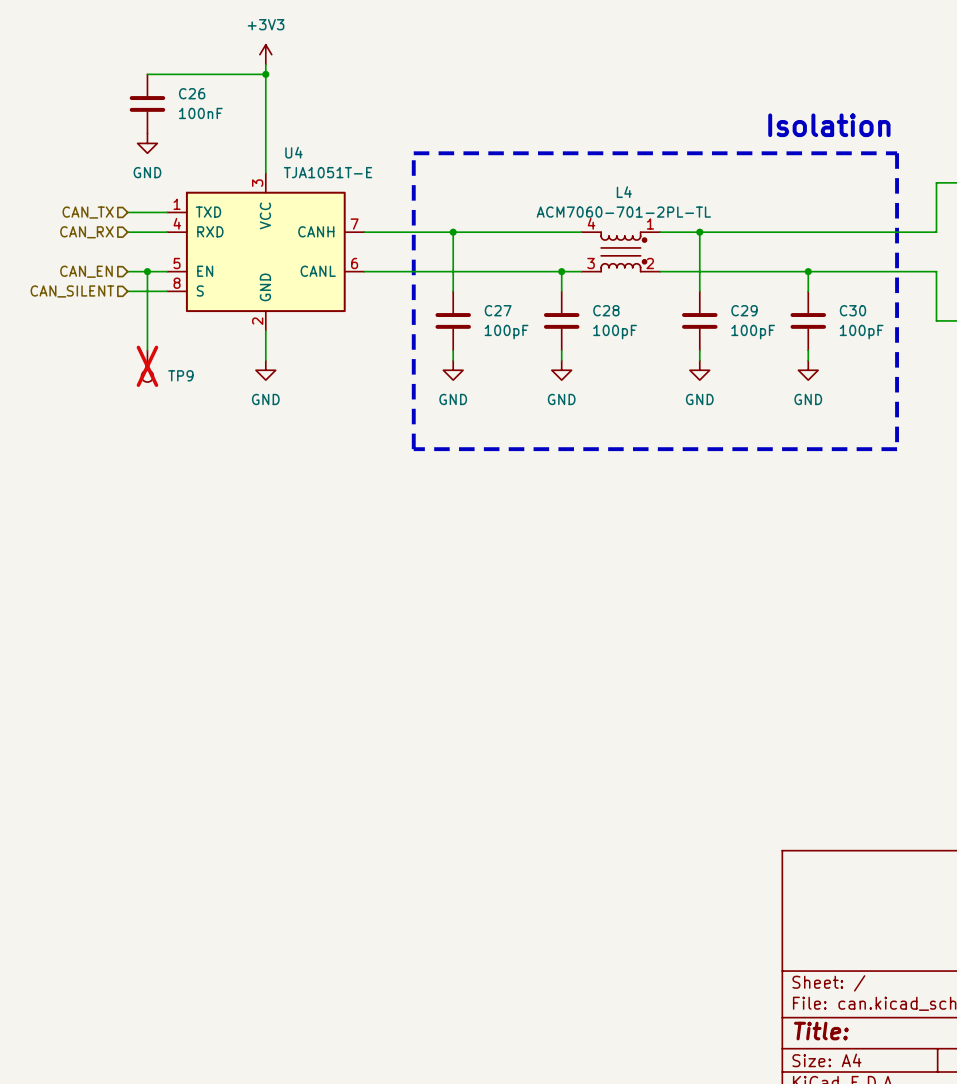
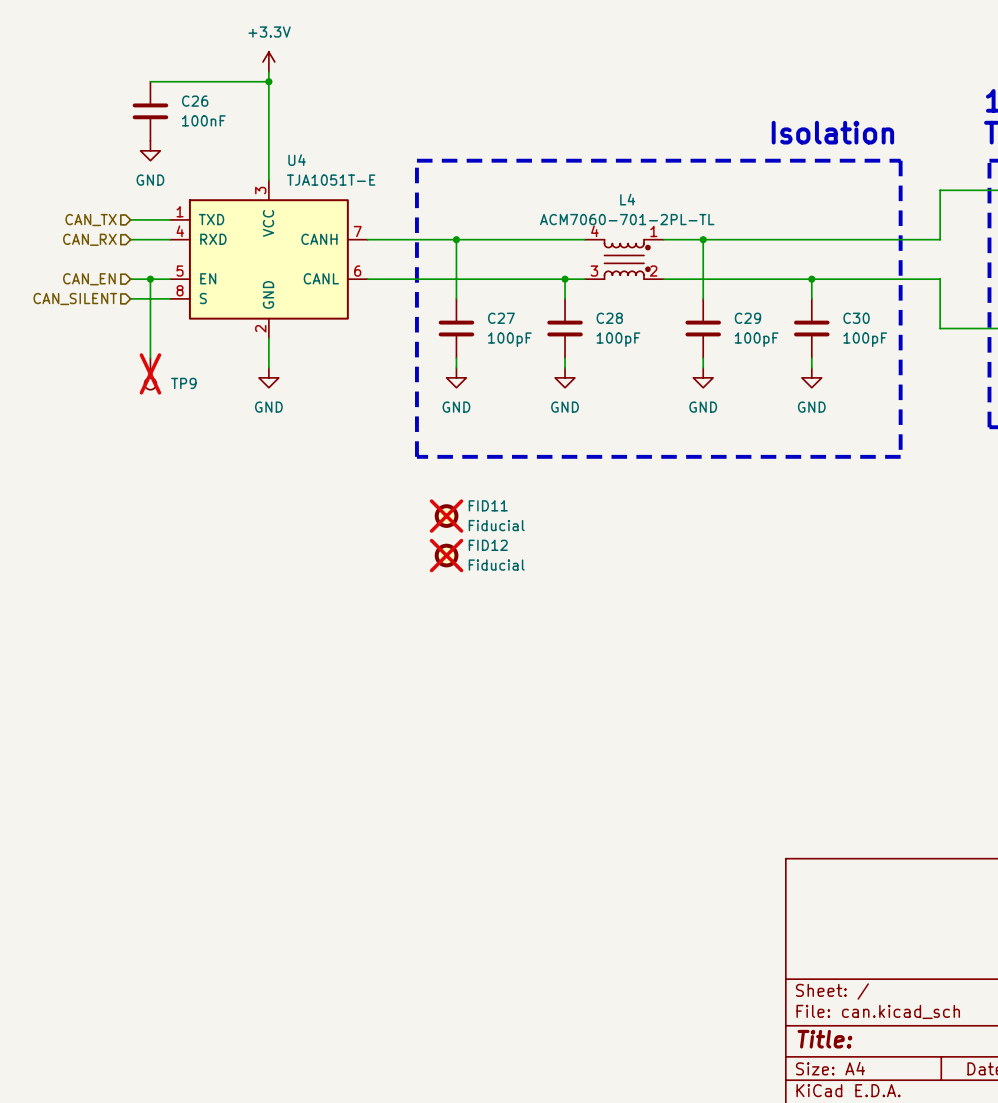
power symbol: +3V3 (265, 54) -> +3.3V (268, 62)
FID11: none -> Fiducial (446, 516)
FID12: none -> Fiducial (446, 555)

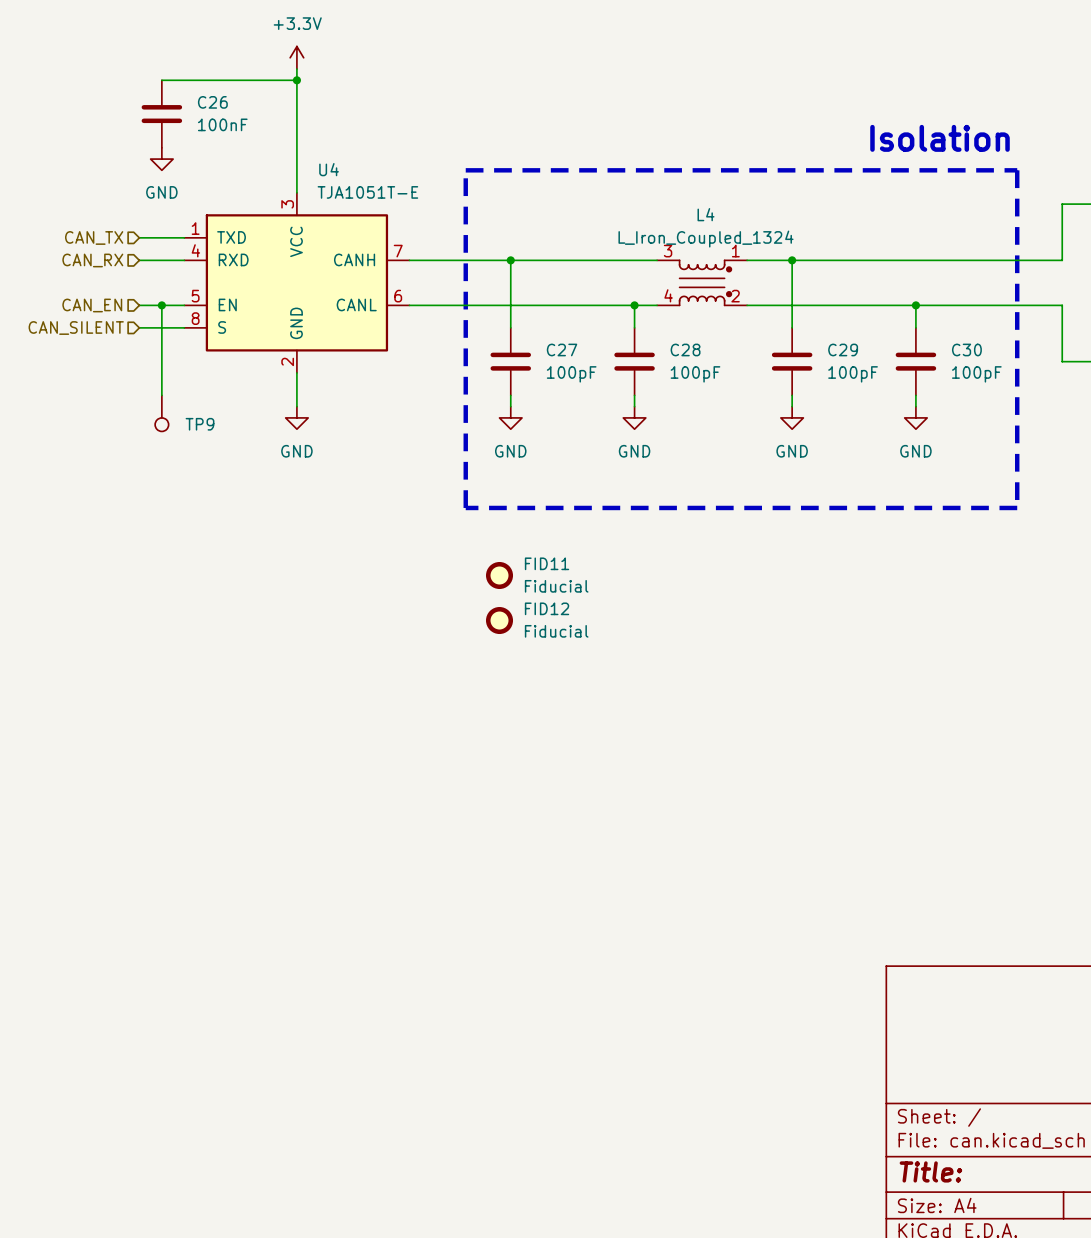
L4 value: ACM7060-701-2PL-TL (627, 219) -> L_Iron_Coupled_1324 (706, 239)
L4 pin number: 4 (594, 231) -> 3 (668, 251)
L4 pin number: 3 (594, 271) -> 4 (668, 295)
TP9 do-not-place cross: (150, 373) -> none
FID11 do-not-place cross: (446, 516) -> none
FID12 do-not-place cross: (446, 555) -> none

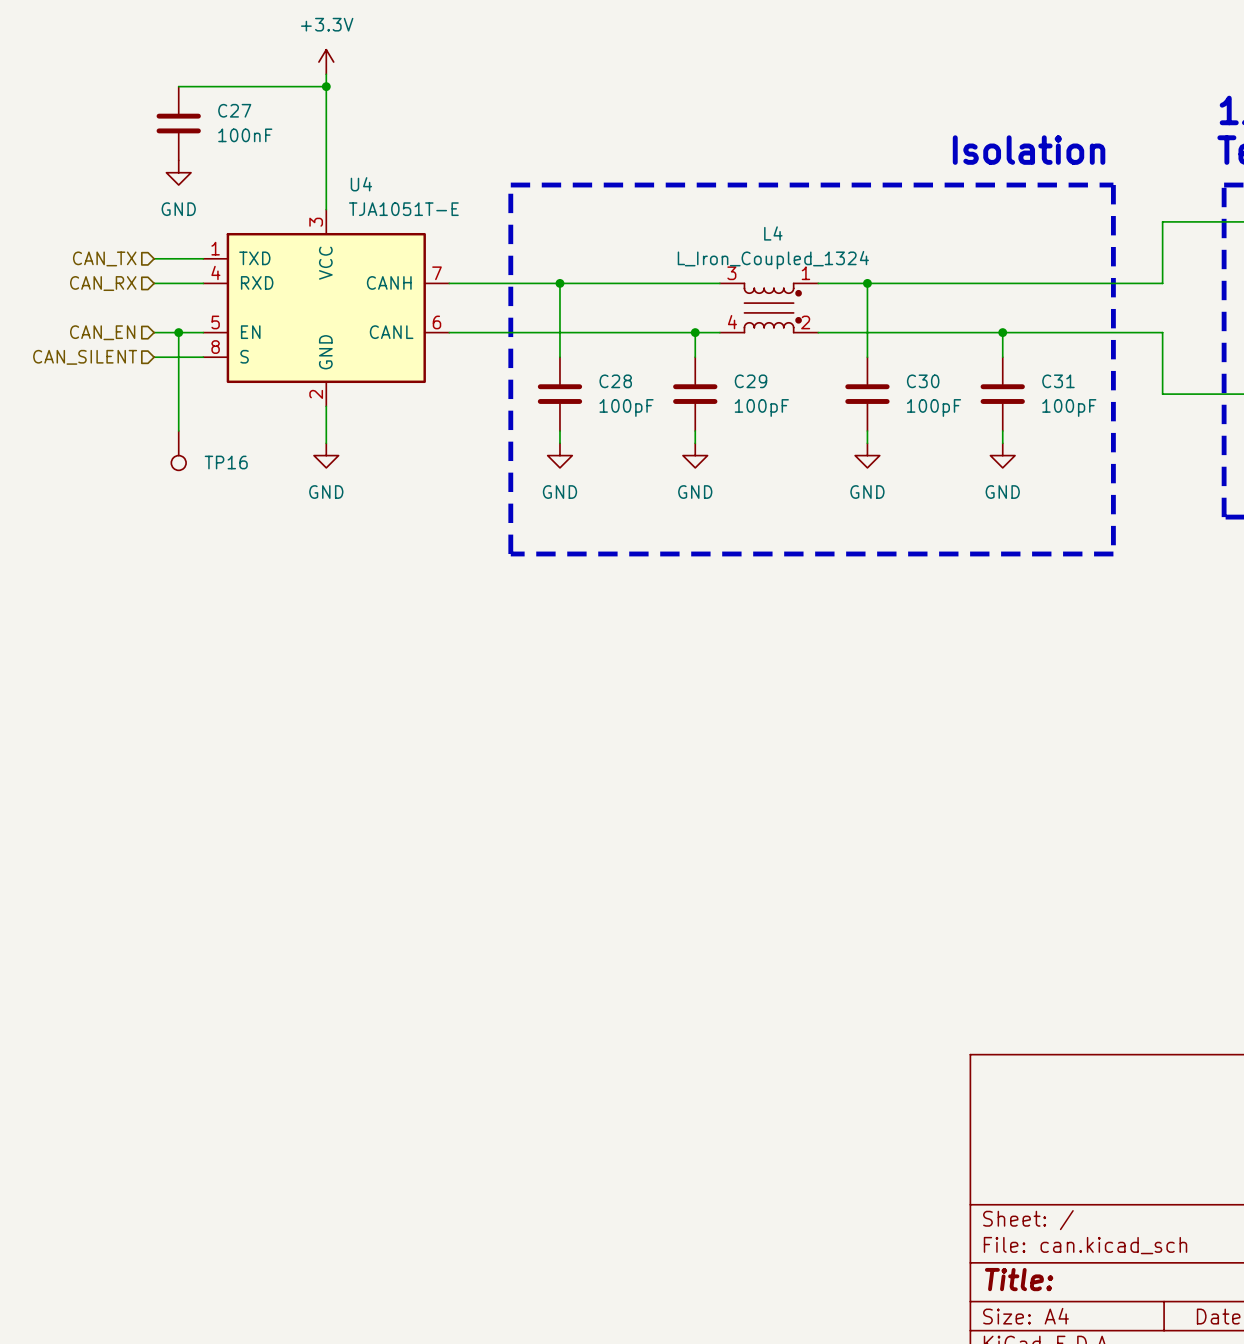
C26 name: C26 (212, 102) -> C27 (234, 110)
C27 name: C27 (562, 349) -> C28 (615, 381)
C28 name: C28 (685, 349) -> C29 (750, 381)
C29 name: C29 (843, 349) -> C30 (923, 381)
C30 name: C30 (966, 349) -> C31 (1058, 381)
TP9 name: TP9 (200, 424) -> TP16 (226, 462)
FID11: Fiducial (499, 575) -> none
FID12: Fiducial (499, 620) -> none

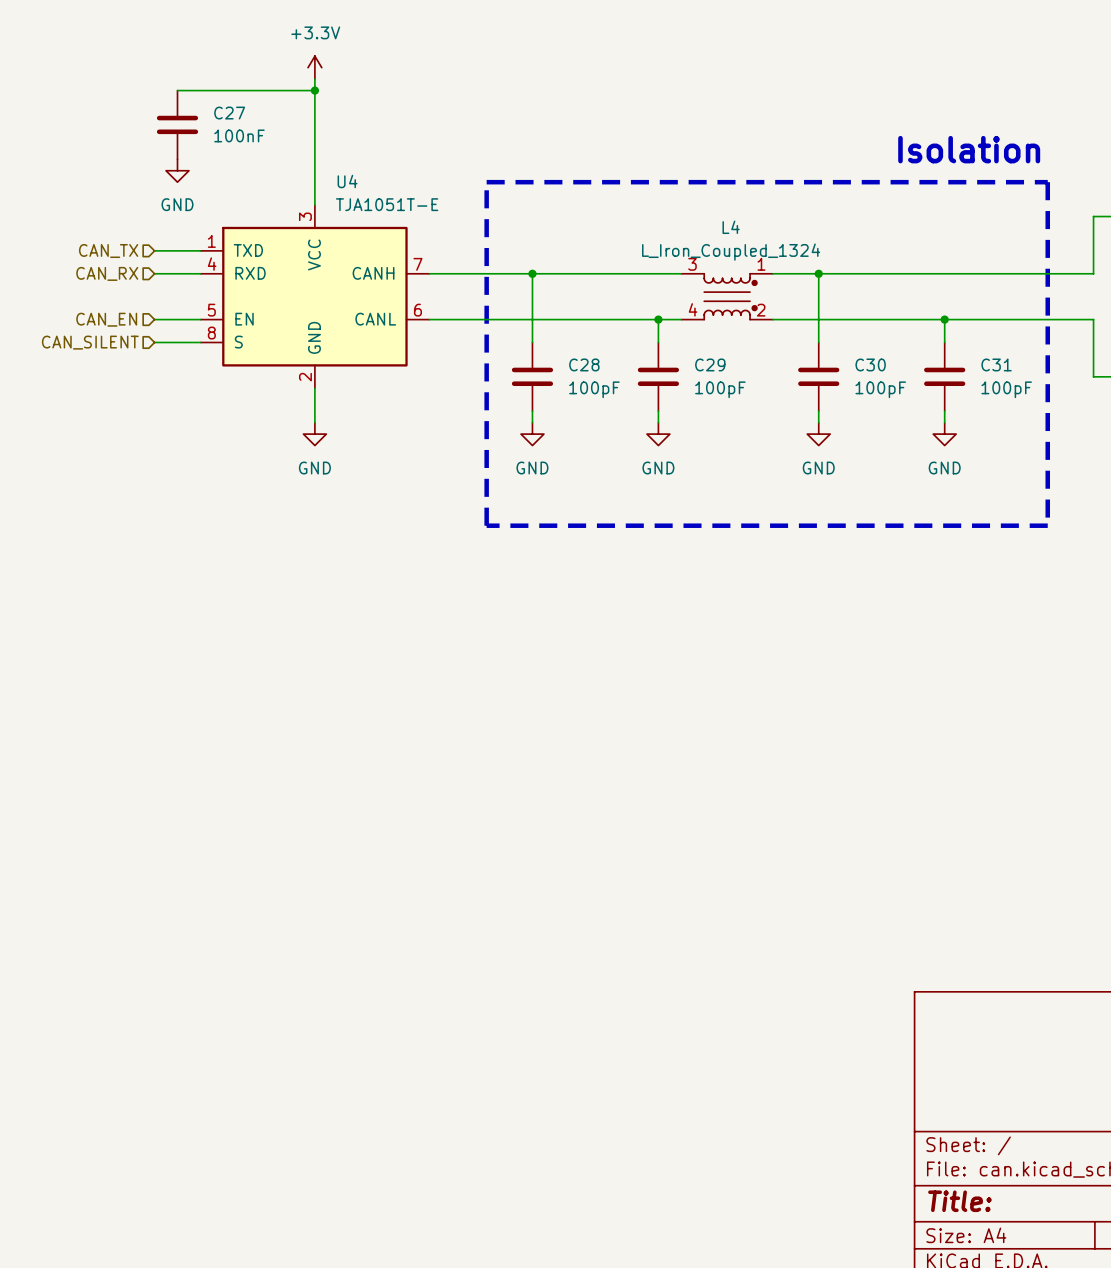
wire: (178, 332) (178, 430) -> none
junction: (178, 332) -> none
TP16: (178, 450) -> none

